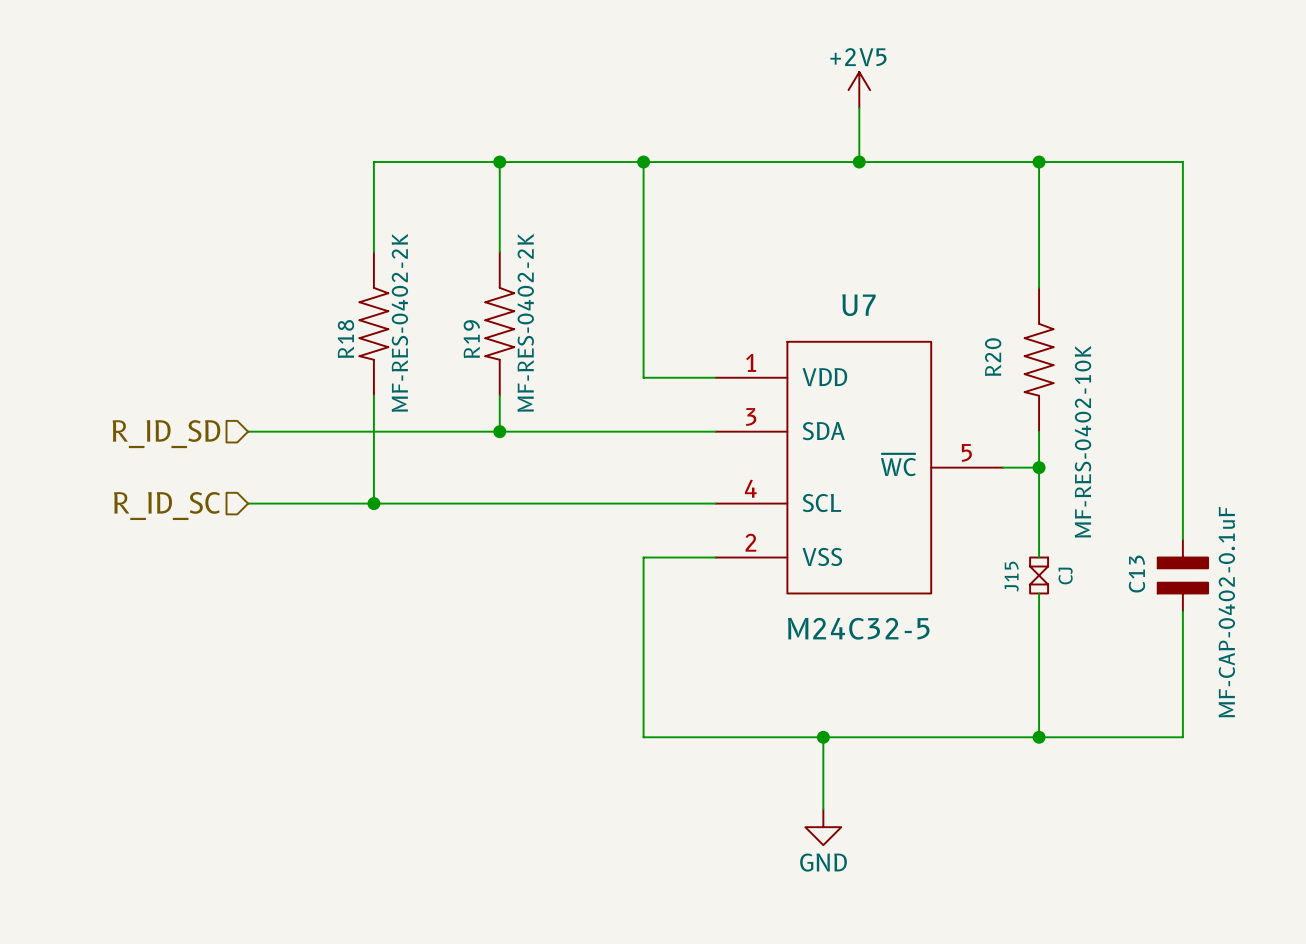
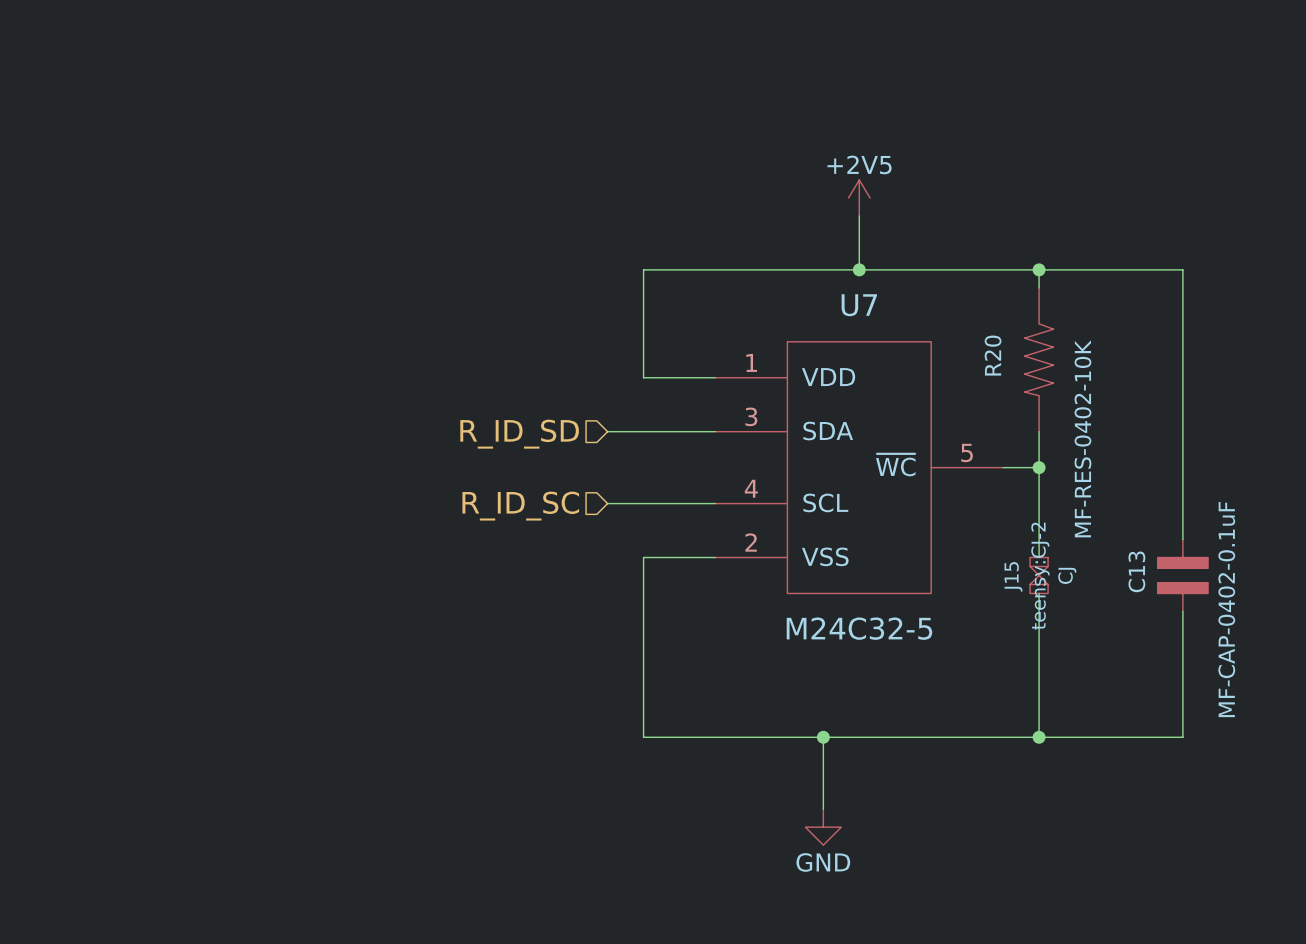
power symbol position: +2V5 (859, 90) -> +2V5 (859, 197)
wire: (859, 108) (859, 162) -> (859, 215) (859, 269)
wire: (499, 162) (499, 251) -> none
junction: (499, 162) -> none
wire: (643, 162) (643, 269) -> none
junction: (643, 162) -> none
junction: (859, 162) -> none
wire: (1039, 162) (1039, 269) -> none
junction: (1039, 162) -> none
wire: (373, 251) (373, 162) (1182, 162) (1182, 269) -> (643, 269) (1182, 269)
junction: none -> (859, 269)
junction: none -> (1039, 269)
R18: MF-RES-0402-2K (373, 323) -> none
R19: MF-RES-0402-2K (499, 323) -> none
wire: (373, 395) (373, 503) -> none
wire: (499, 395) (499, 431) -> none
wire: (248, 431) (607, 431) -> none
junction: (499, 431) -> none
hierarchical label: R_ID_SD (166, 434) -> none
hierarchical label: none -> R_ID_SD (519, 434)
wire: (248, 503) (607, 503) -> none
junction: (373, 503) -> none
hierarchical label: R_ID_SC (167, 506) -> none
hierarchical label: none -> R_ID_SC (520, 506)
J15 text: none -> teensy:CJ-2 (1040, 576)

